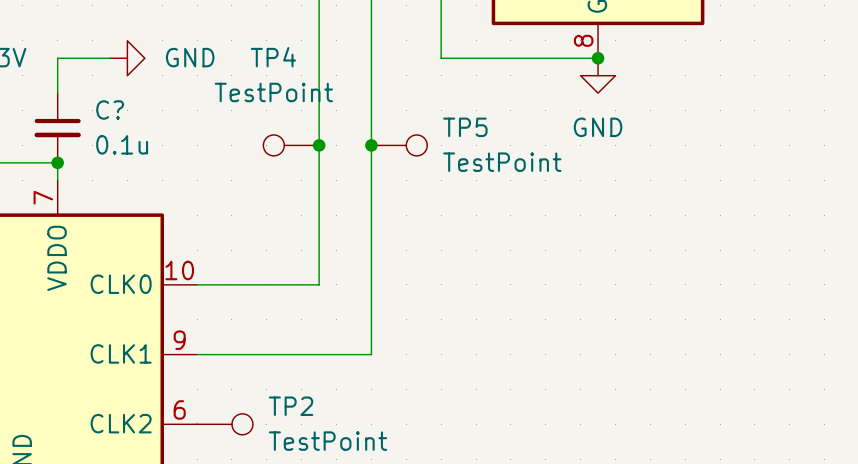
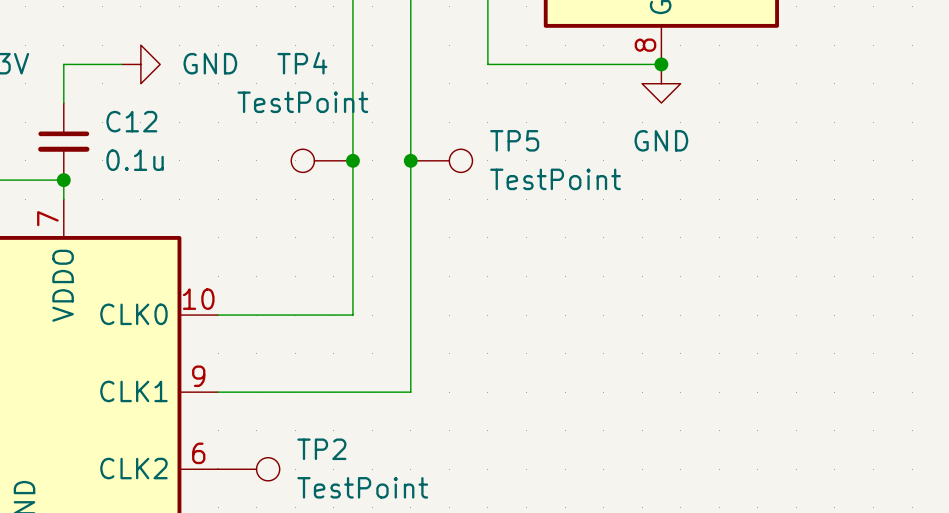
C? name: C? (110, 109) -> C12 (131, 121)

